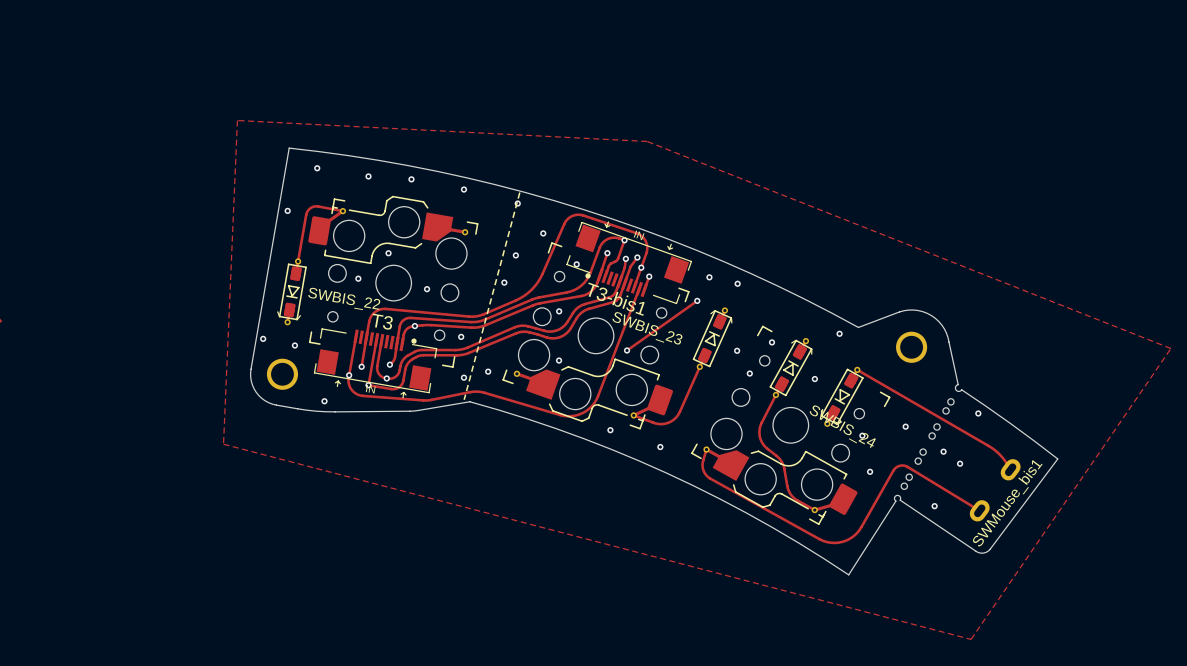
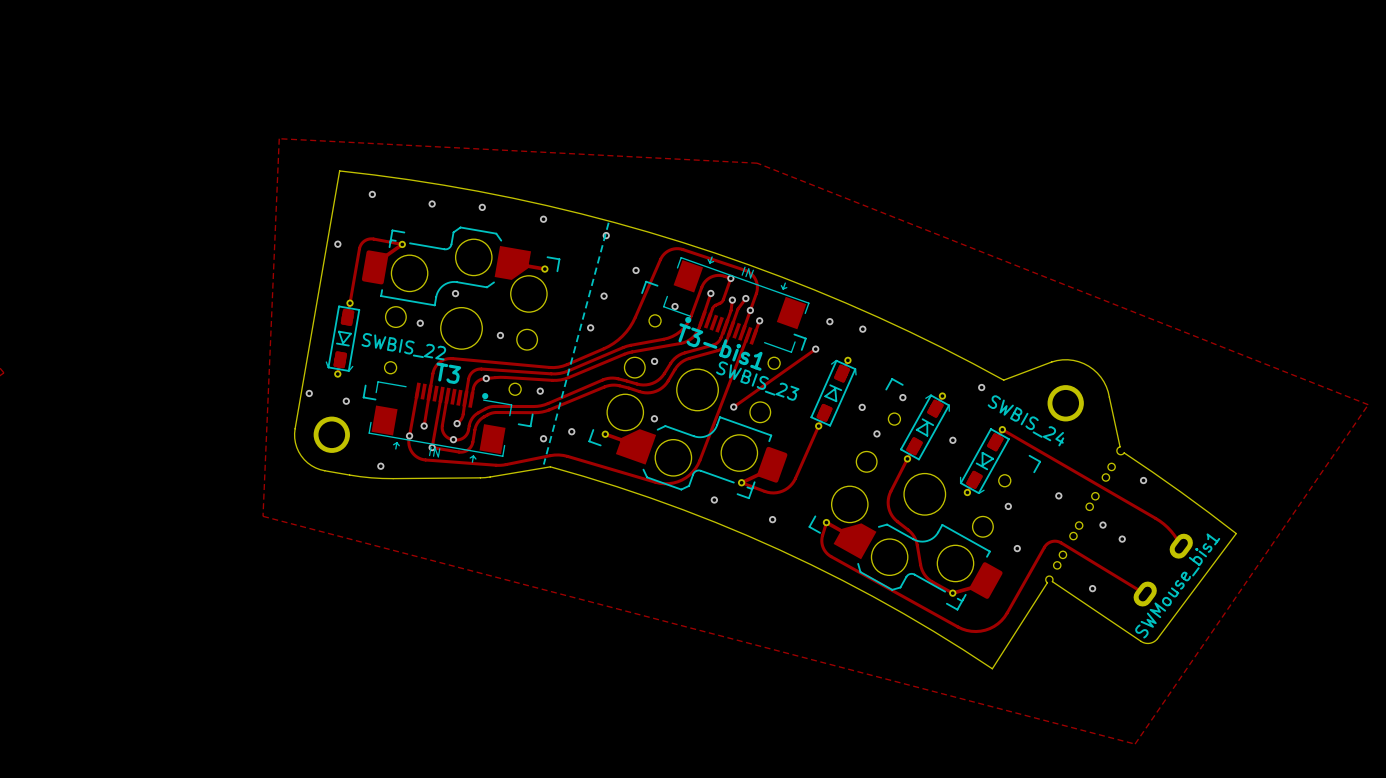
SWBIS_24 name position: SWBIS_24 (842, 426) -> SWBIS_24 (1025, 420)

